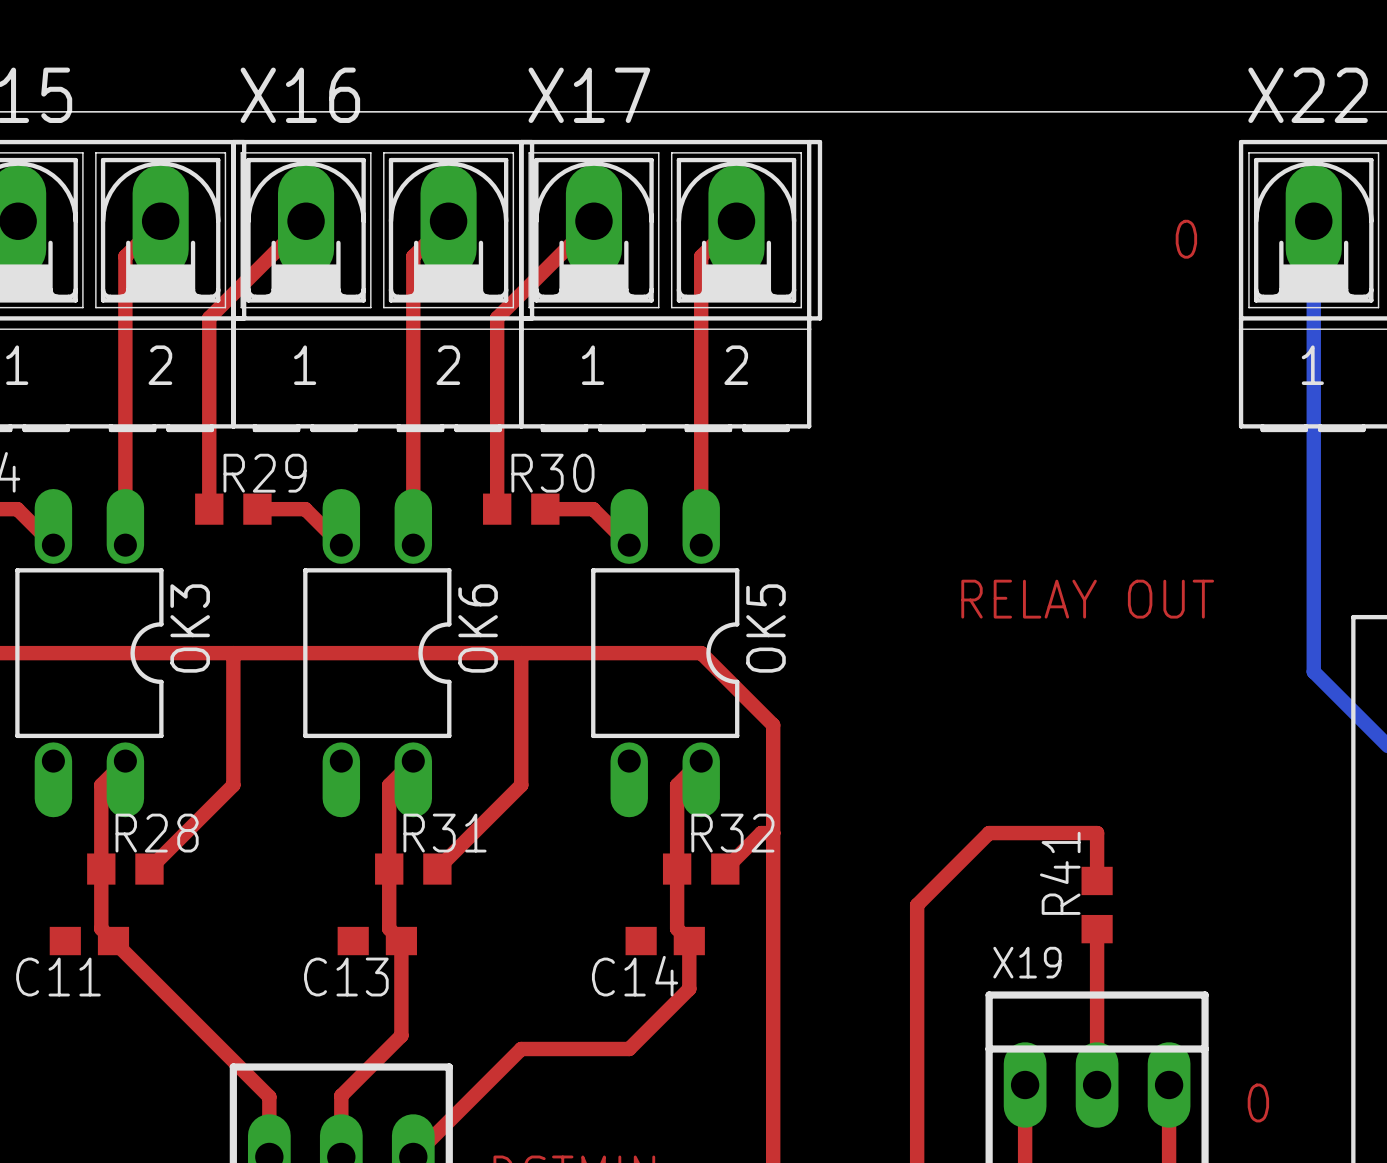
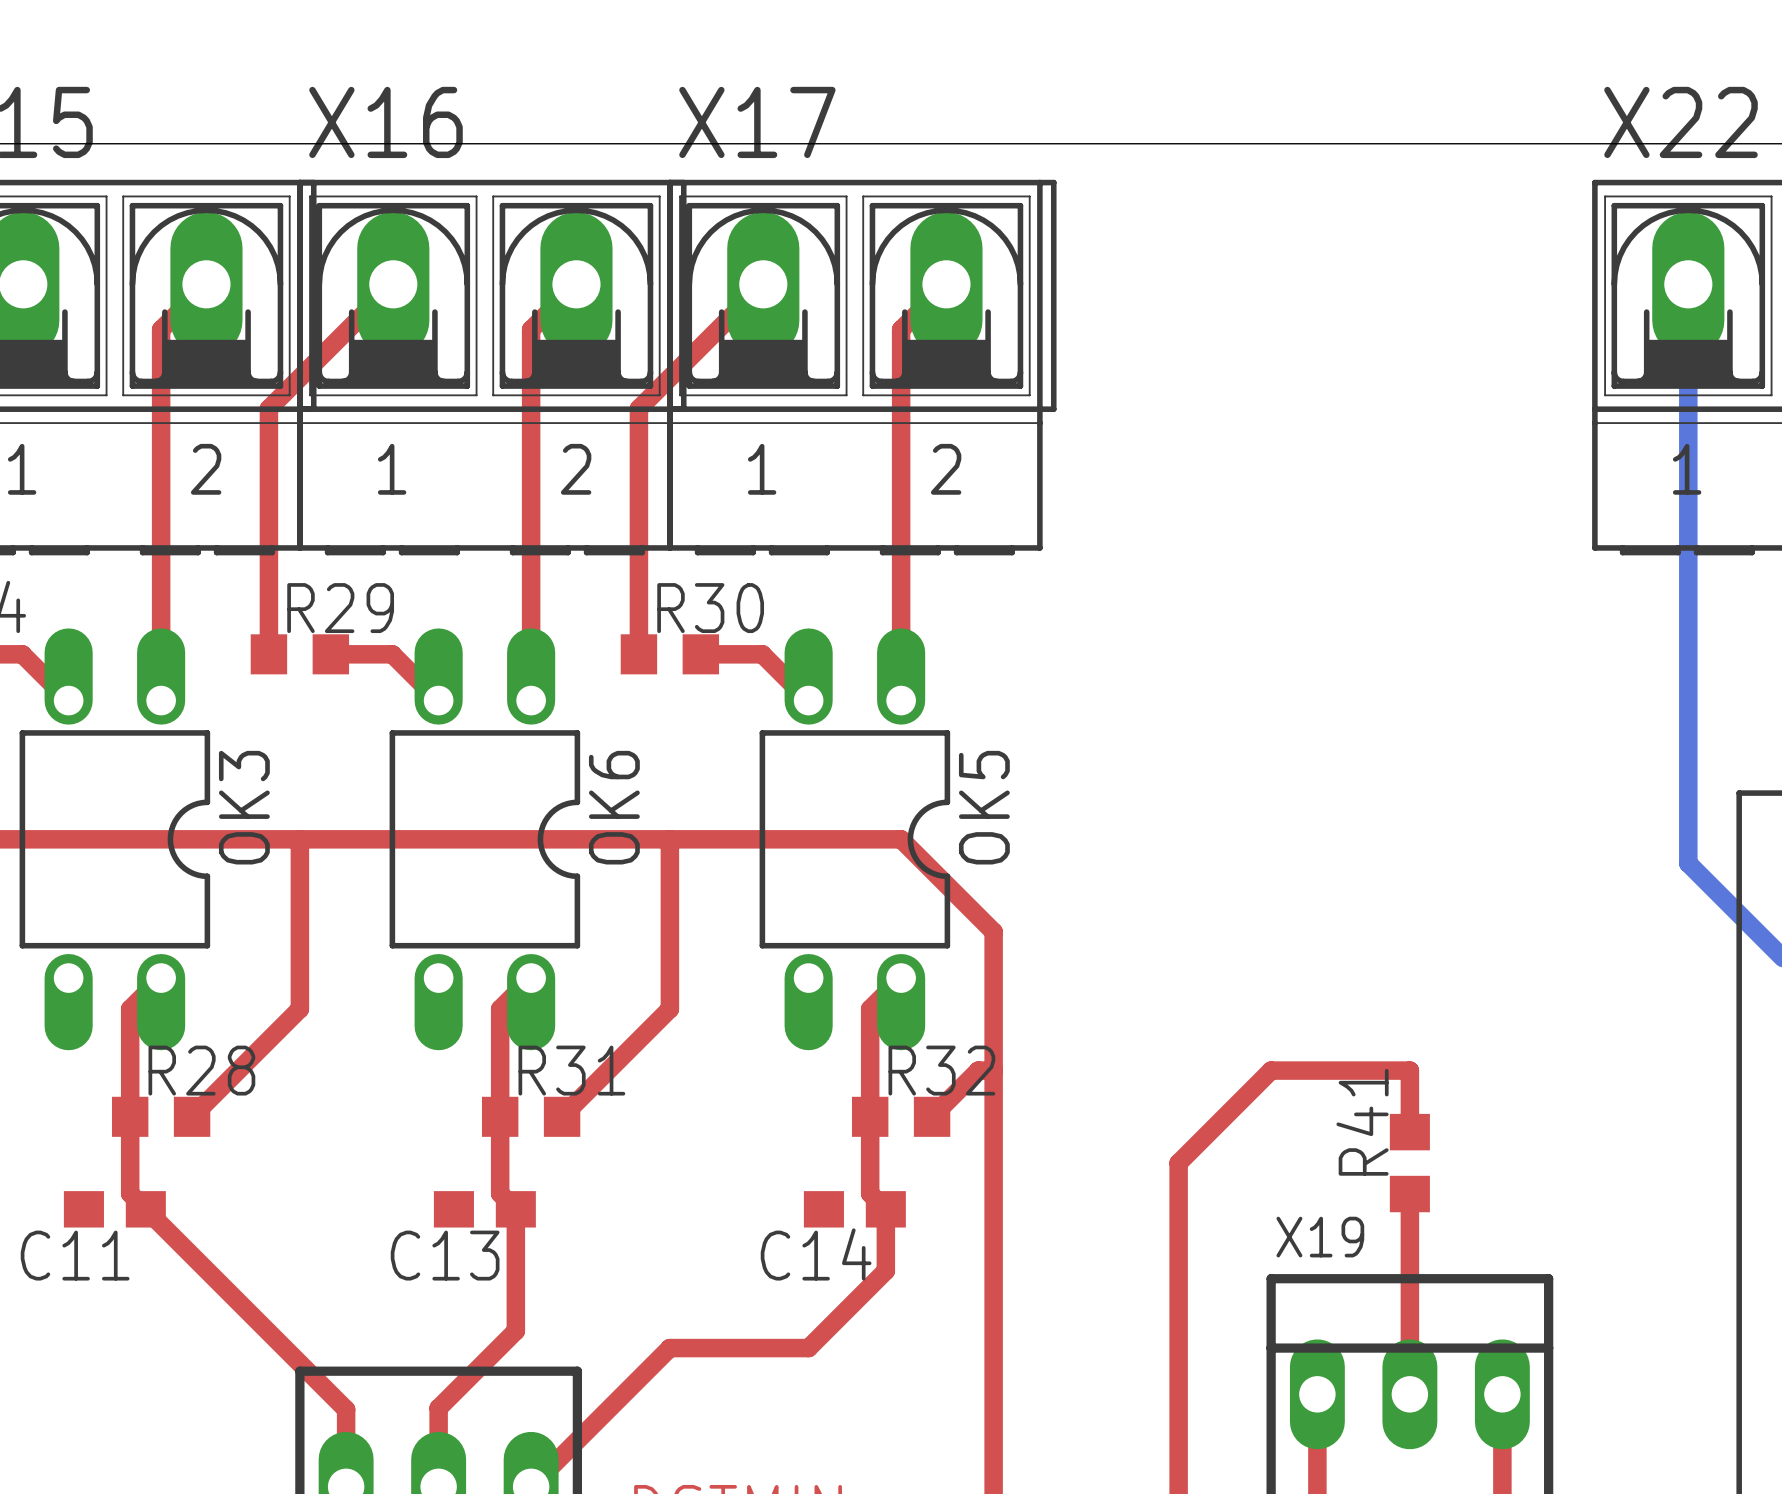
text: 0 (1186, 239) -> none
text: RELAY OUT (1087, 599) -> none
text: 0 (1258, 1102) -> none

